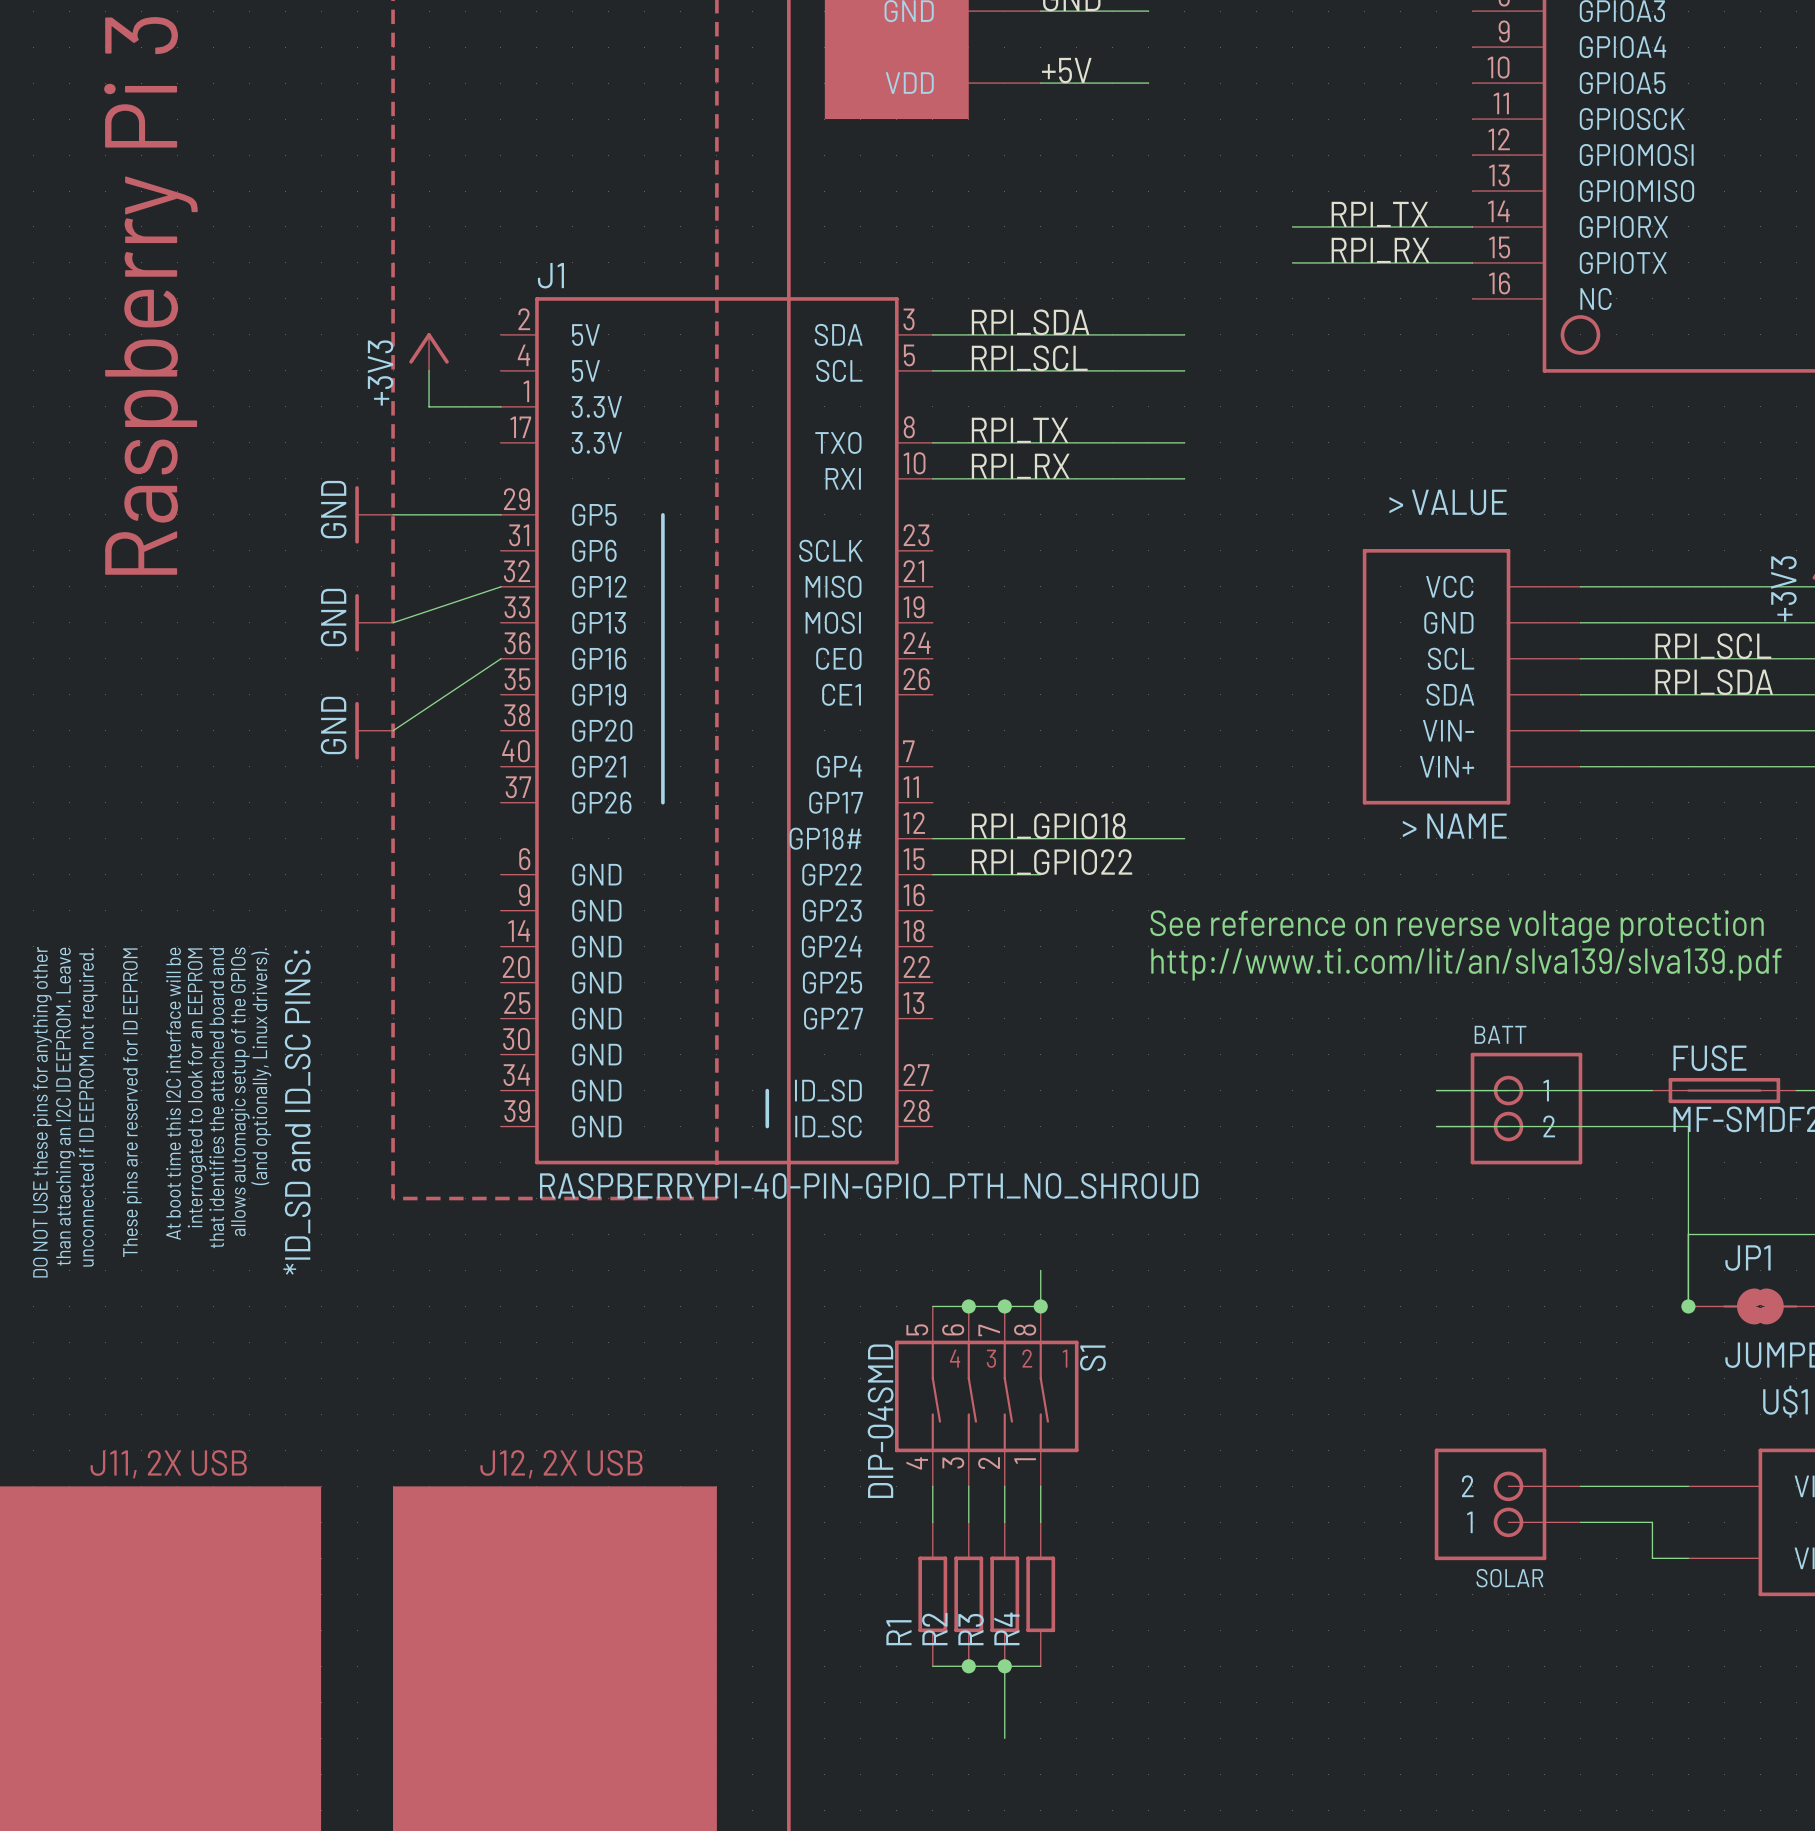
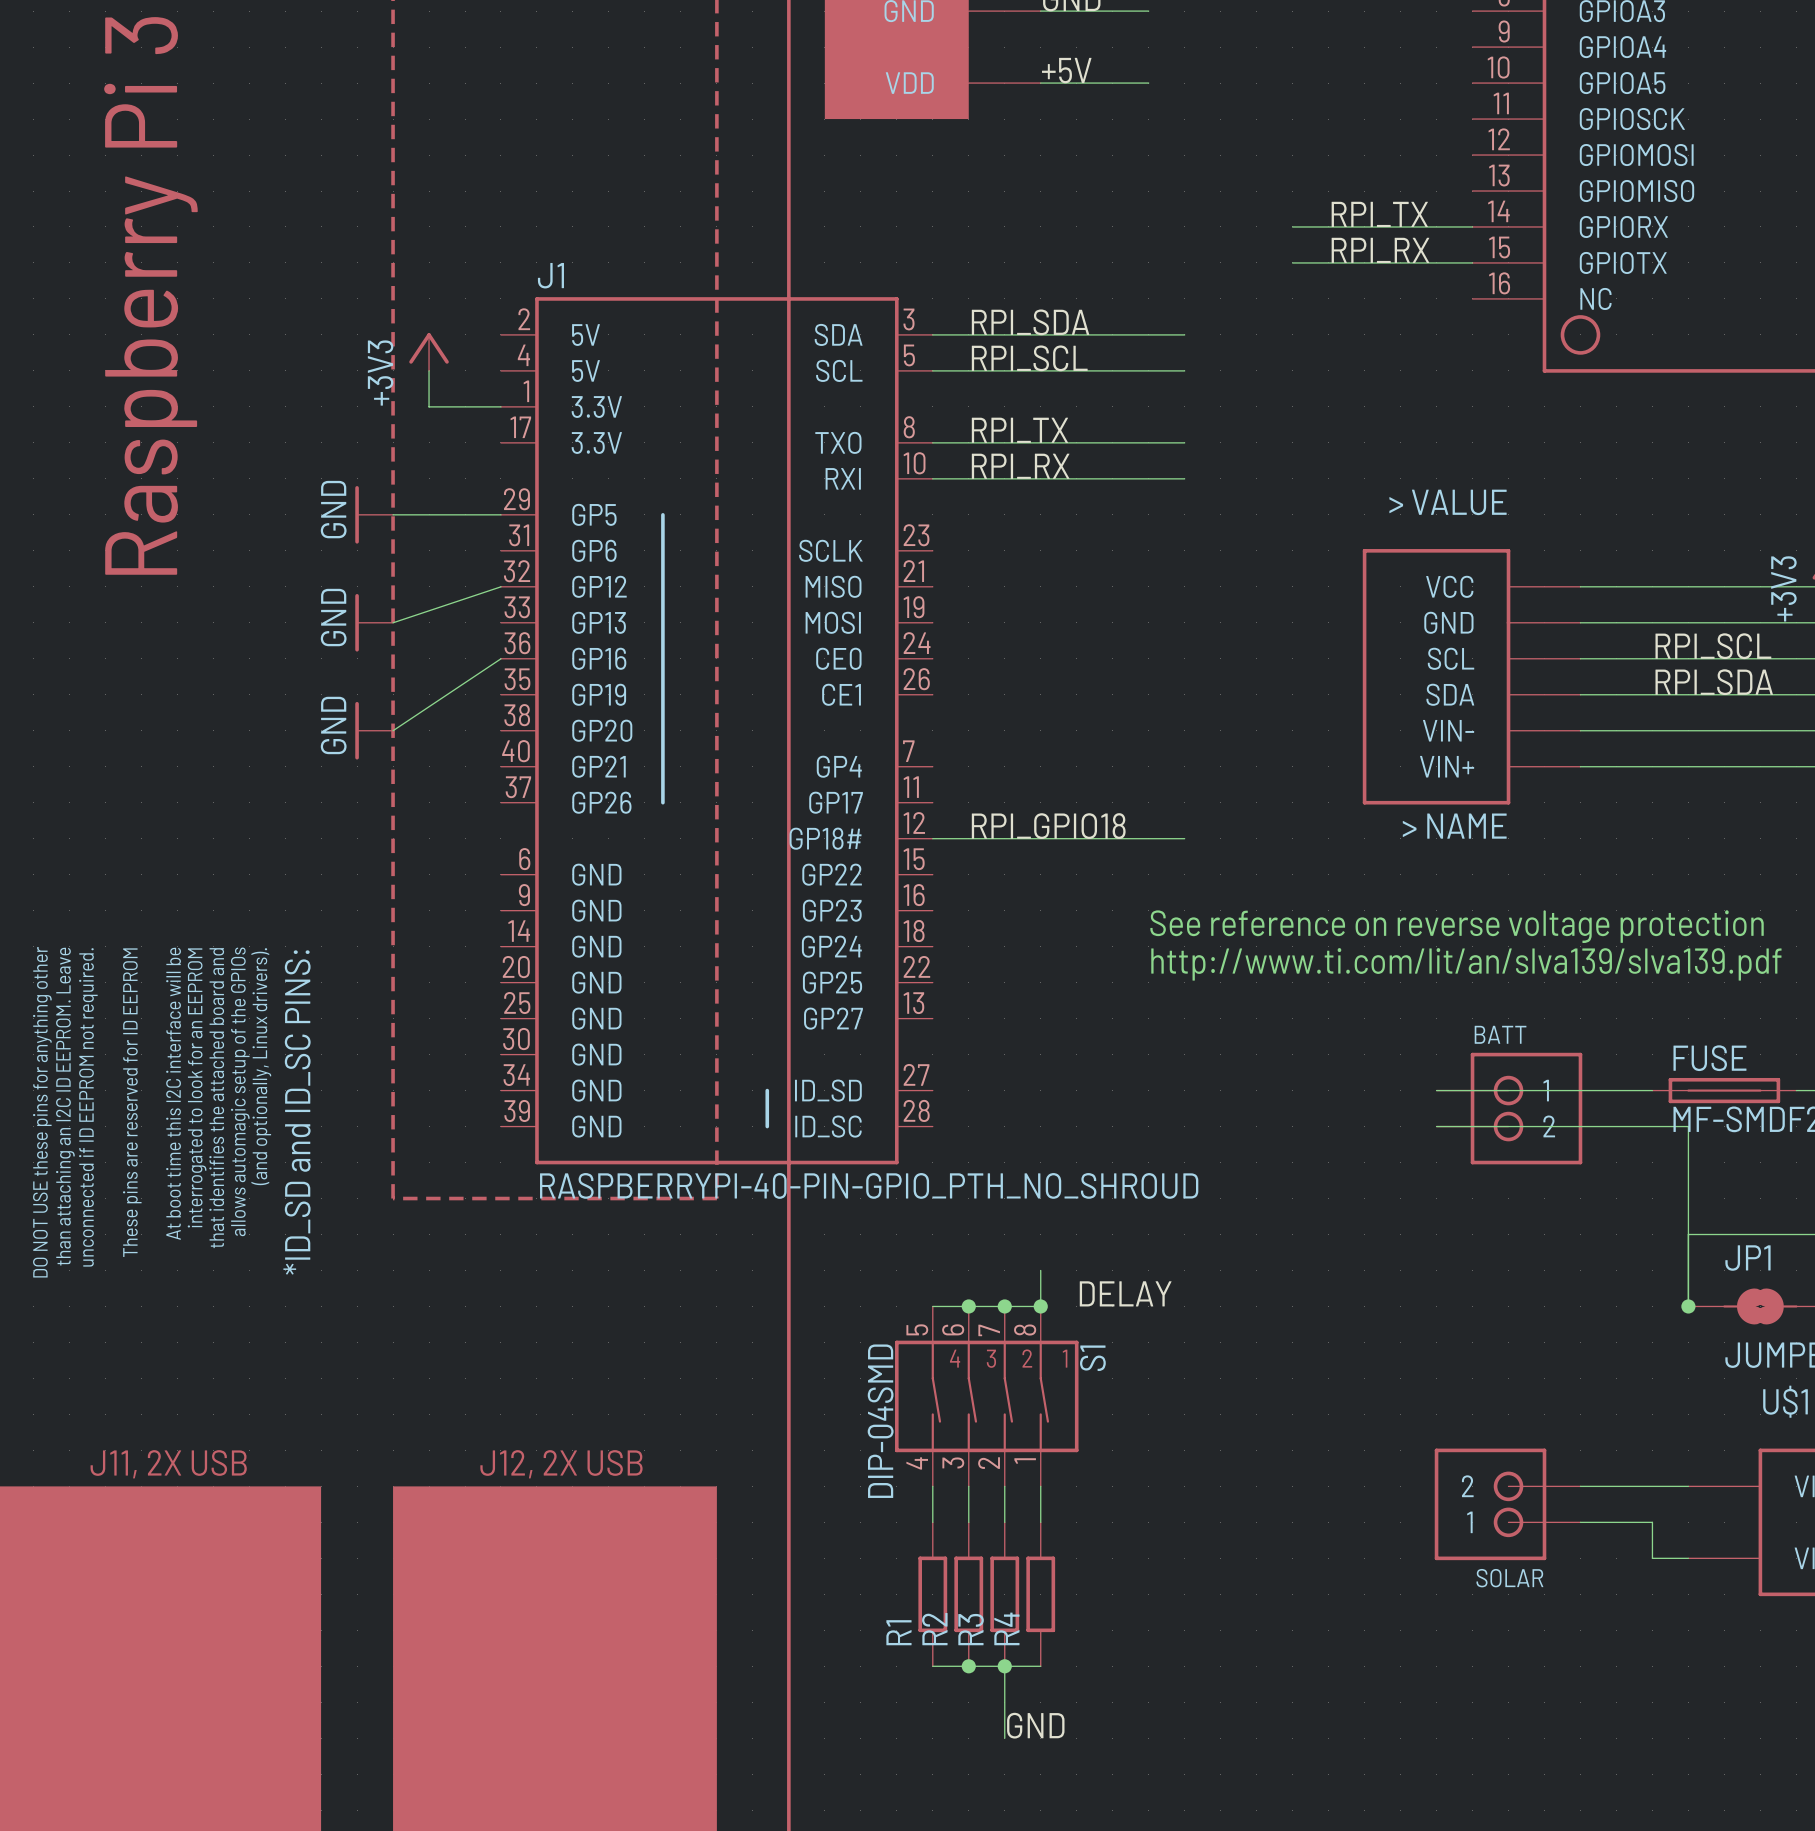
label: RPI_GPIO22 (1052, 862) -> none
wire: (932, 874) (1040, 874) -> none
label: none -> DELAY (1125, 1293)
label: none -> GND (1035, 1725)

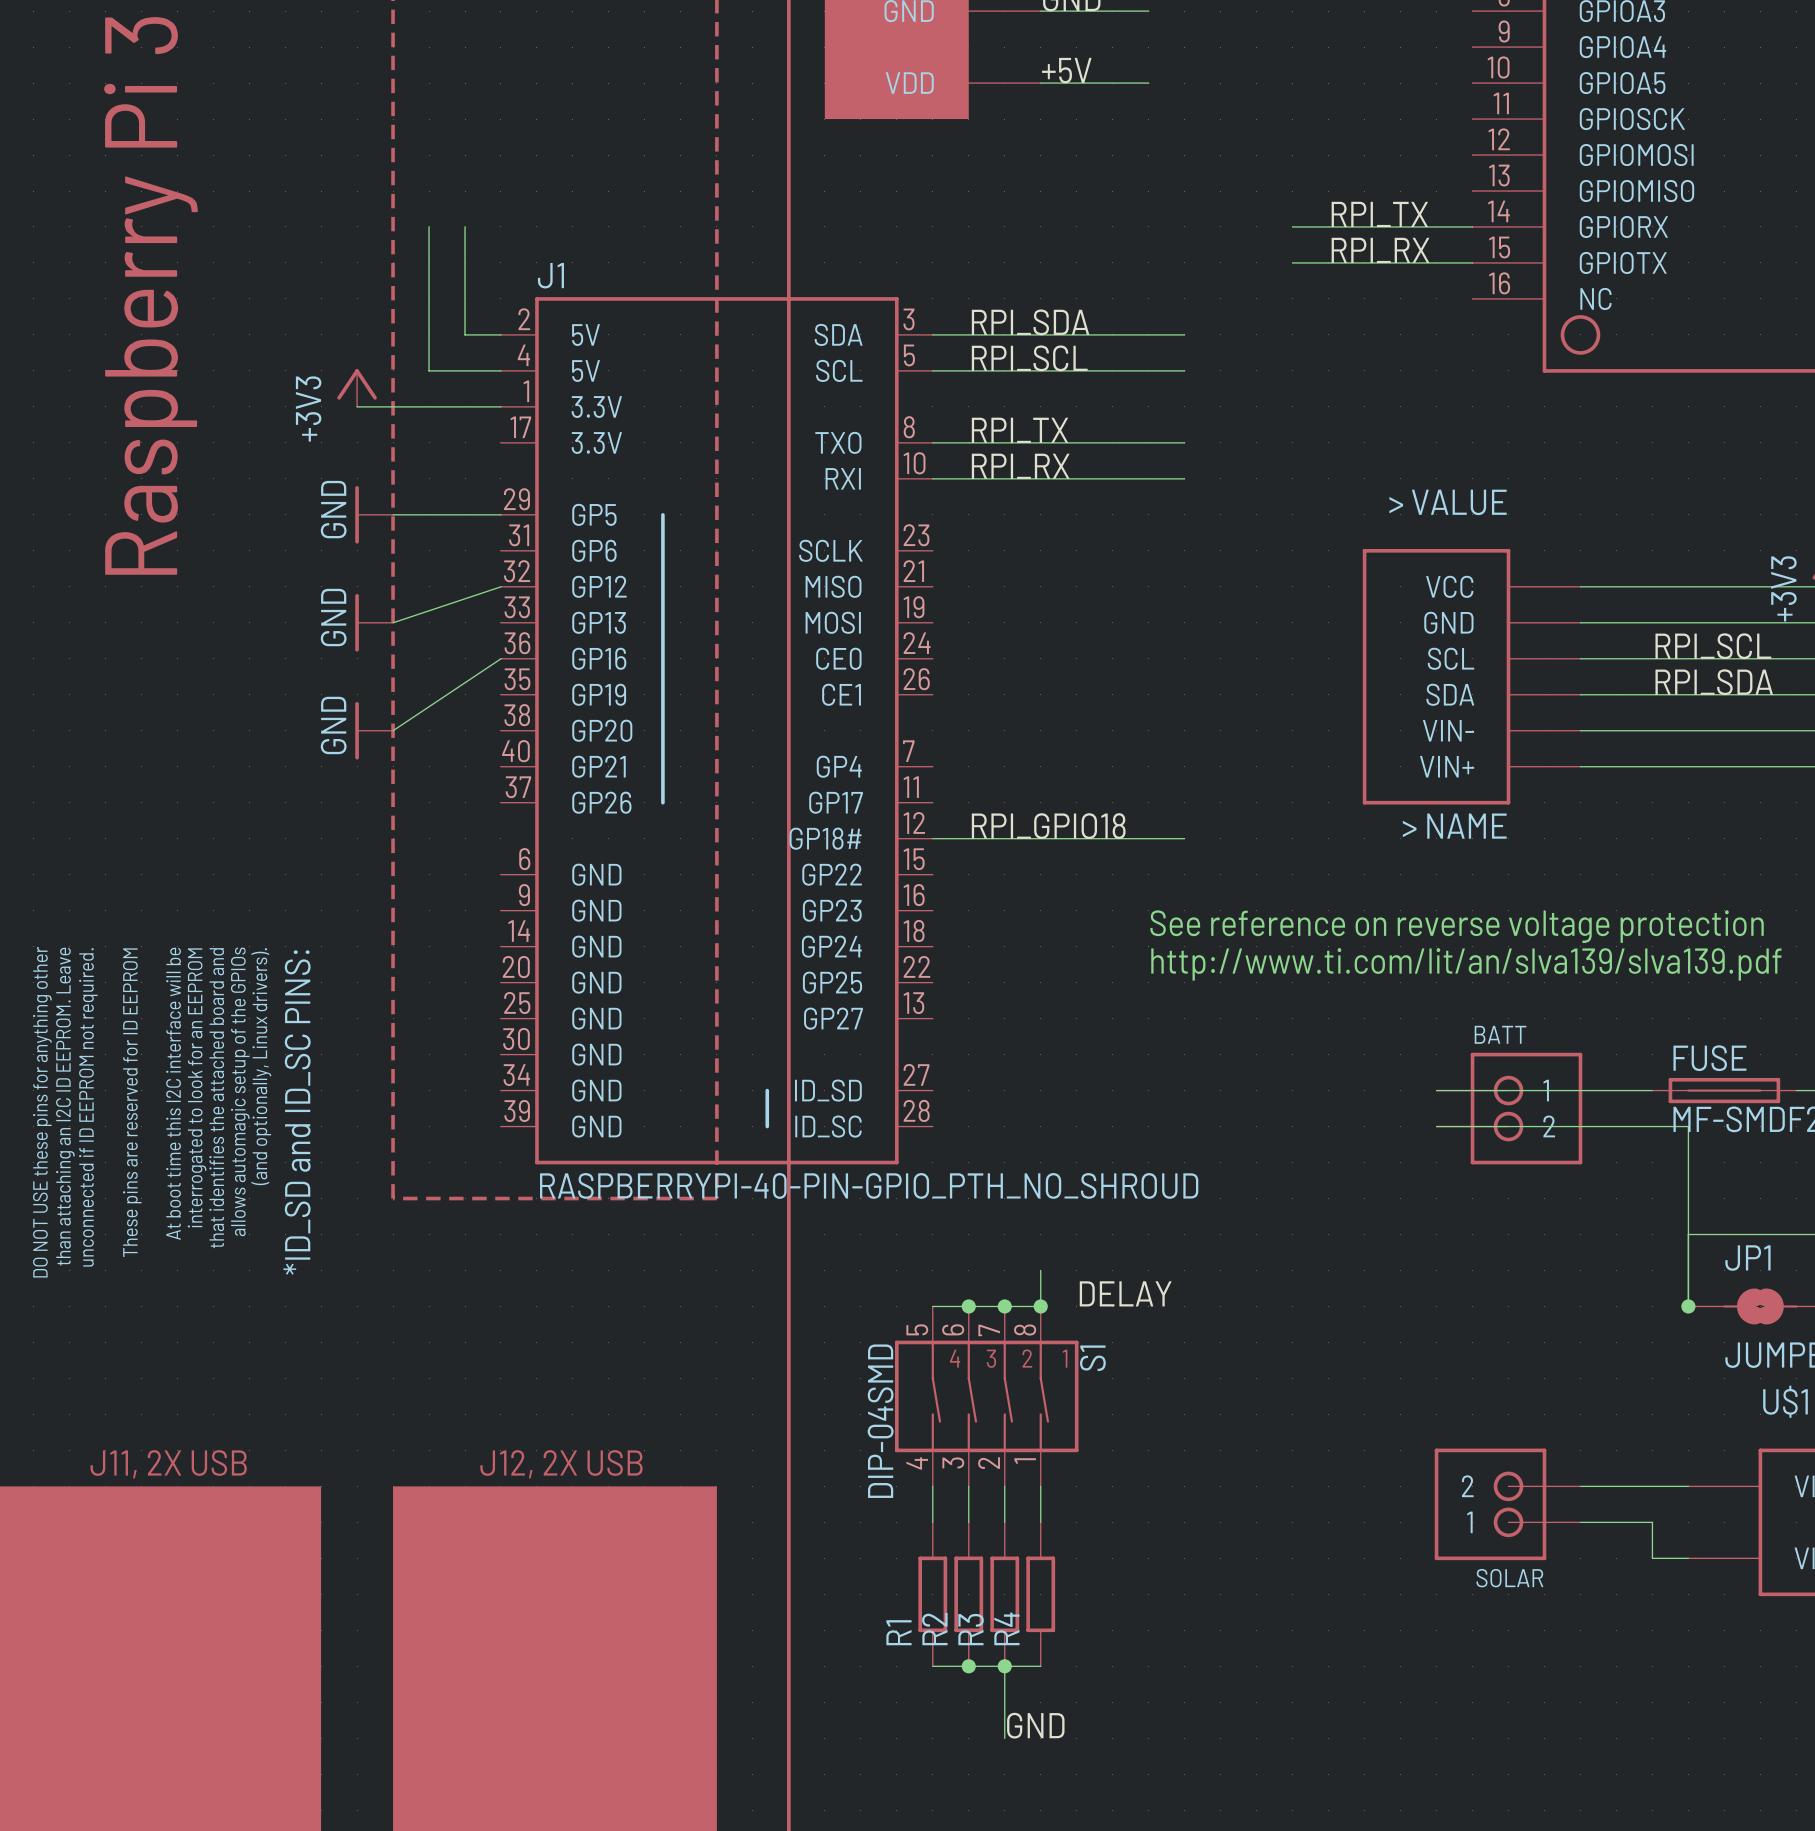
wire: none -> (429, 226) (429, 370) (500, 370)
wire: none -> (465, 226) (465, 334) (500, 334)
power symbol position: +3V3 (429, 352) -> +3V3 (357, 388)
wire: (429, 370) (429, 406) -> (357, 406) (429, 406)

